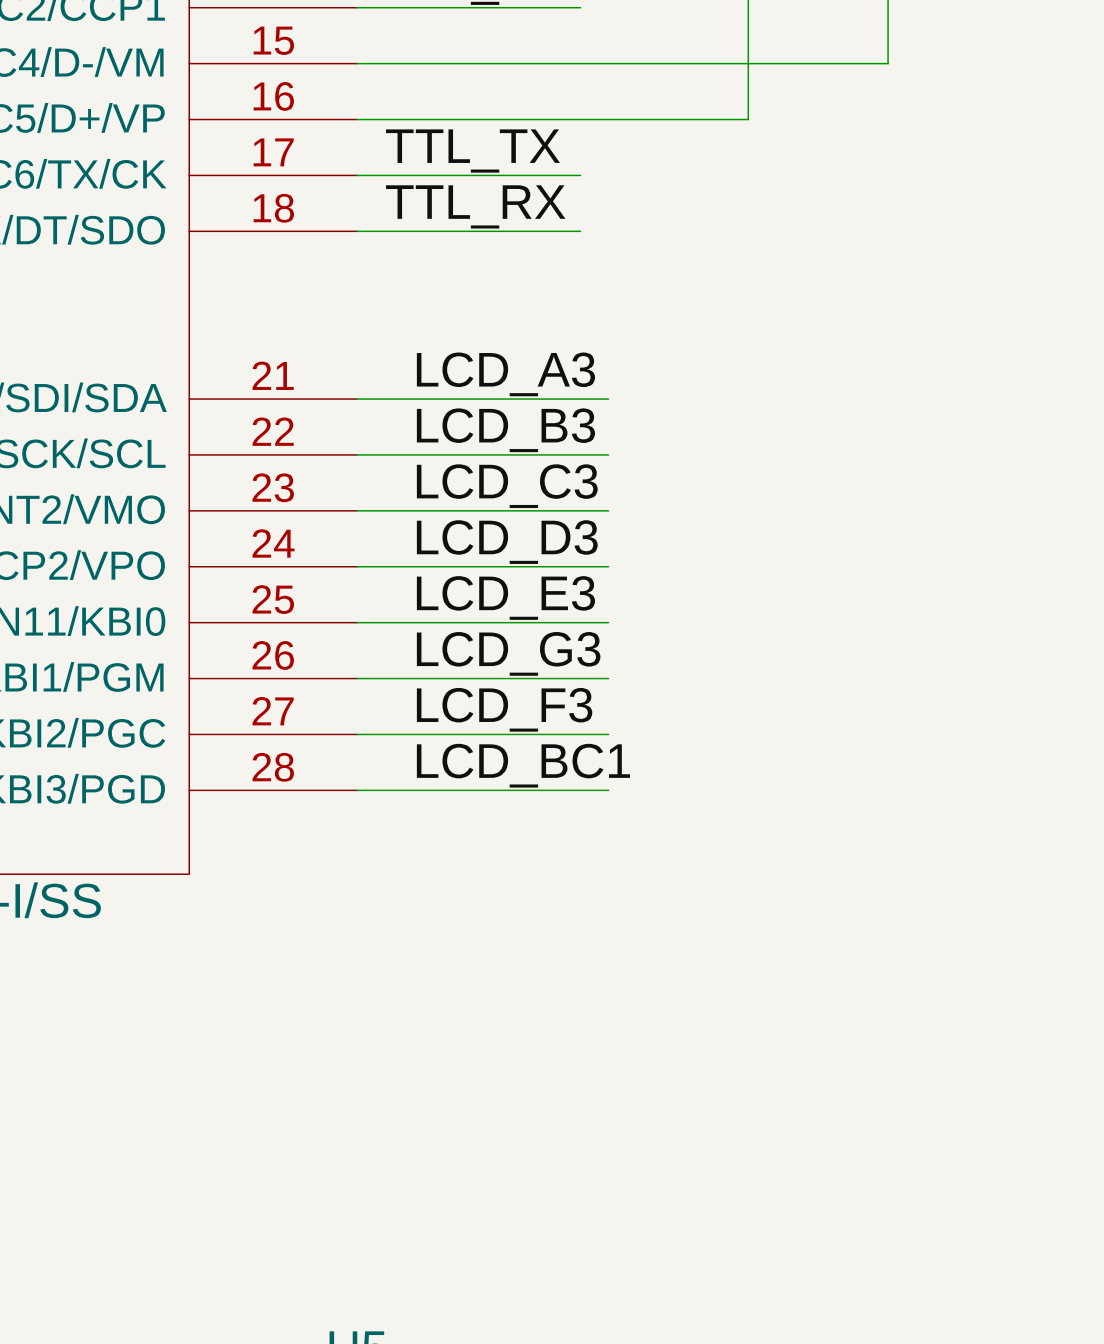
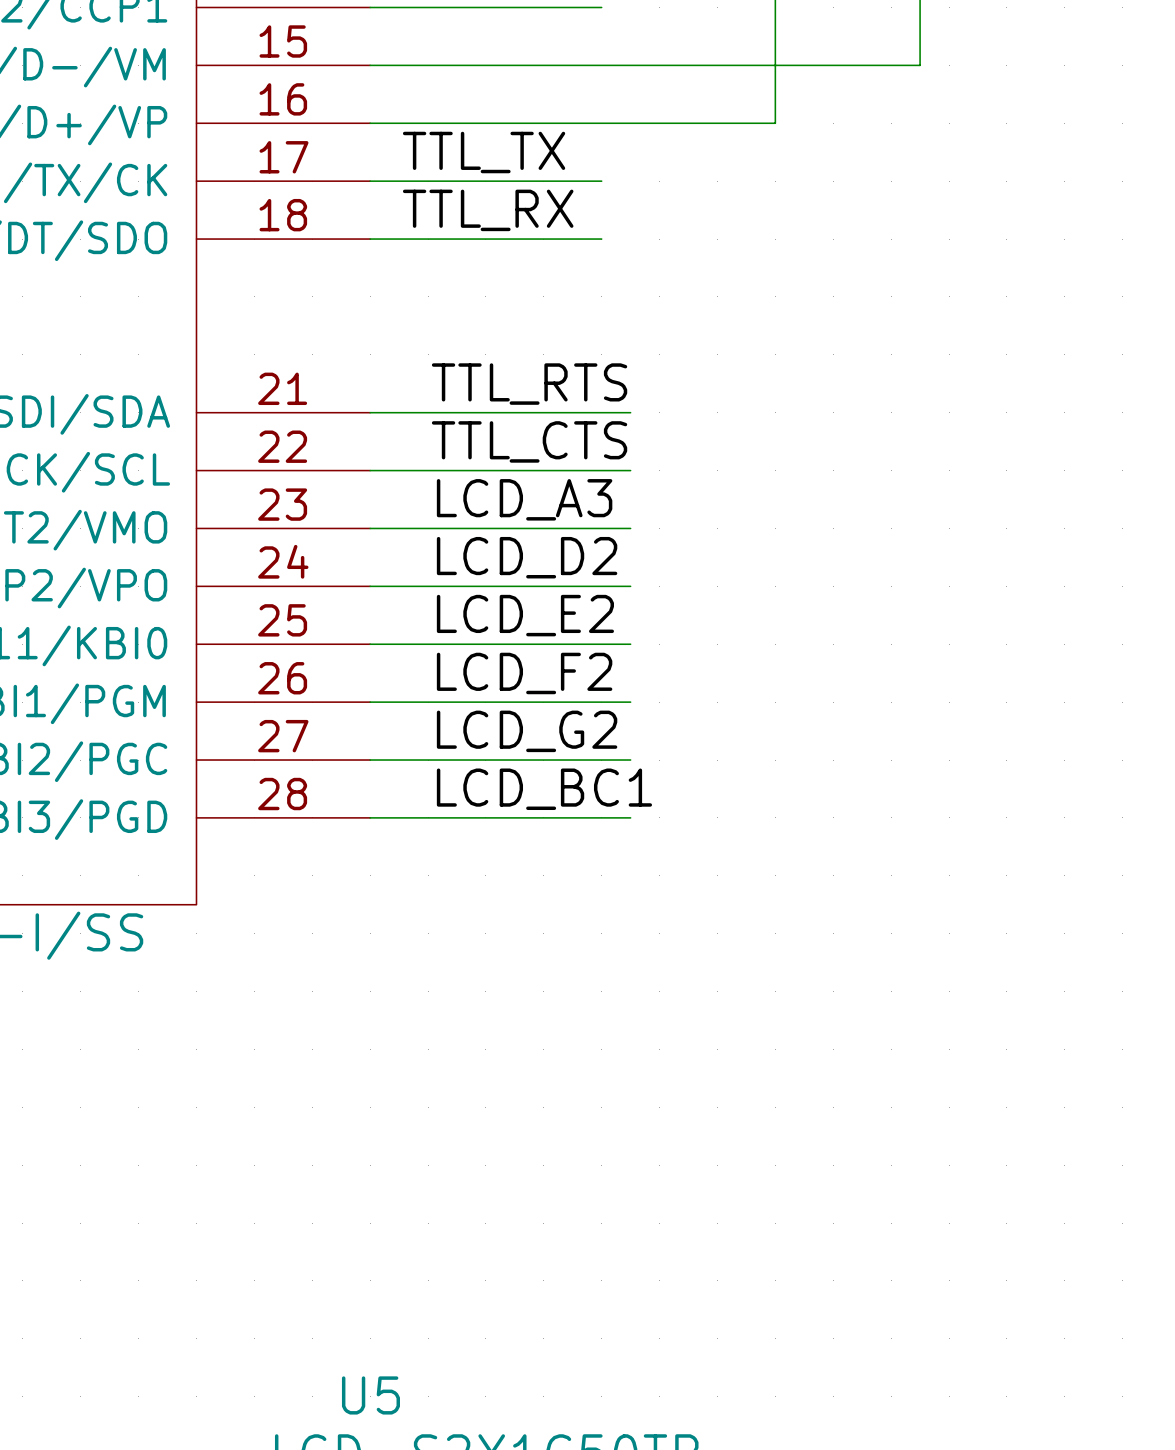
label: LCD_A3 (505, 374) -> TTL_RTS (529, 384)
label: LCD_B3 (505, 430) -> TTL_CTS (529, 441)
label: LCD_C3 (507, 486) -> LCD_A3 (524, 499)
label: LCD_D3 (507, 542) -> LCD_D2 (527, 557)
label: LCD_E3 (505, 597) -> LCD_E2 (525, 615)
label: LCD_G3 (508, 653) -> LCD_F2 (524, 673)
label: LCD_F3 (504, 709) -> LCD_G2 (527, 731)

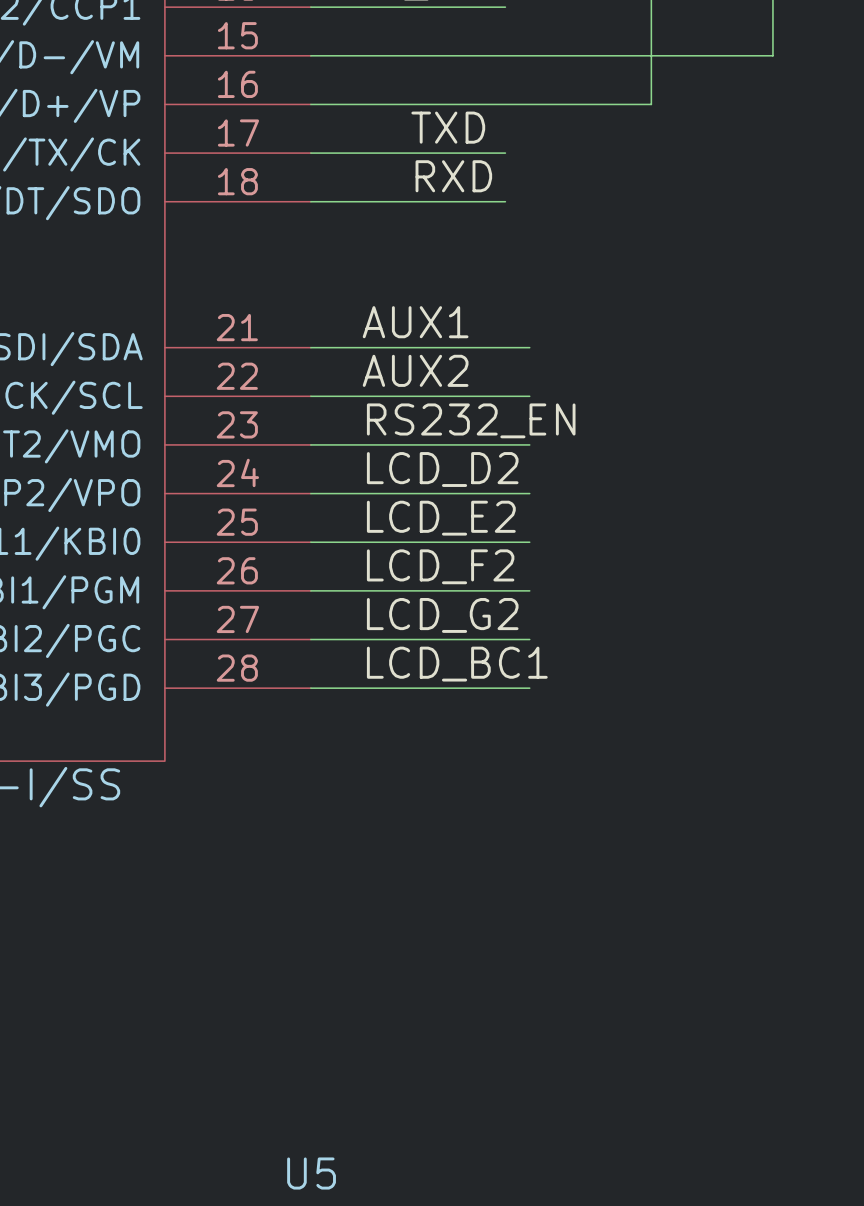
label: none -> TXD (448, 127)
label: TTL_TX (484, 152) -> none
label: none -> RXD (453, 176)
label: TTL_RX (488, 210) -> none
label: TTL_RTS (529, 384) -> AUX1 (415, 322)
label: TTL_CTS (529, 441) -> AUX2 (415, 370)
label: LCD_A3 (524, 499) -> RS232_EN (471, 420)

